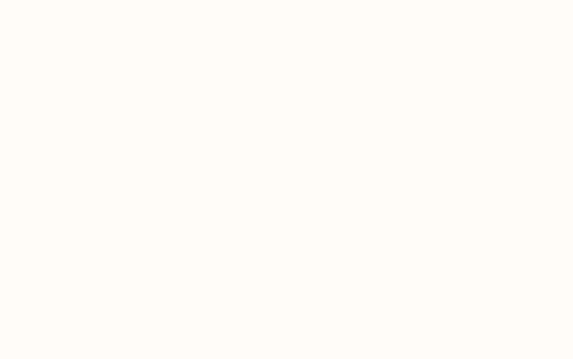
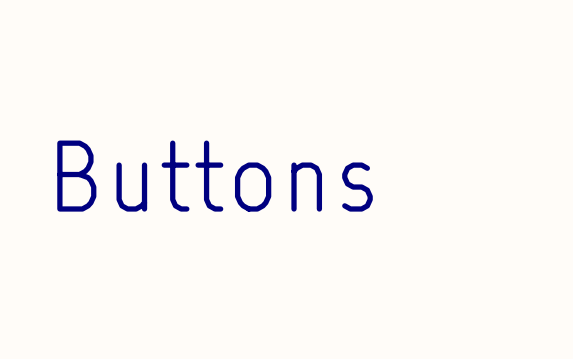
text: none -> Buttons (215, 176)

